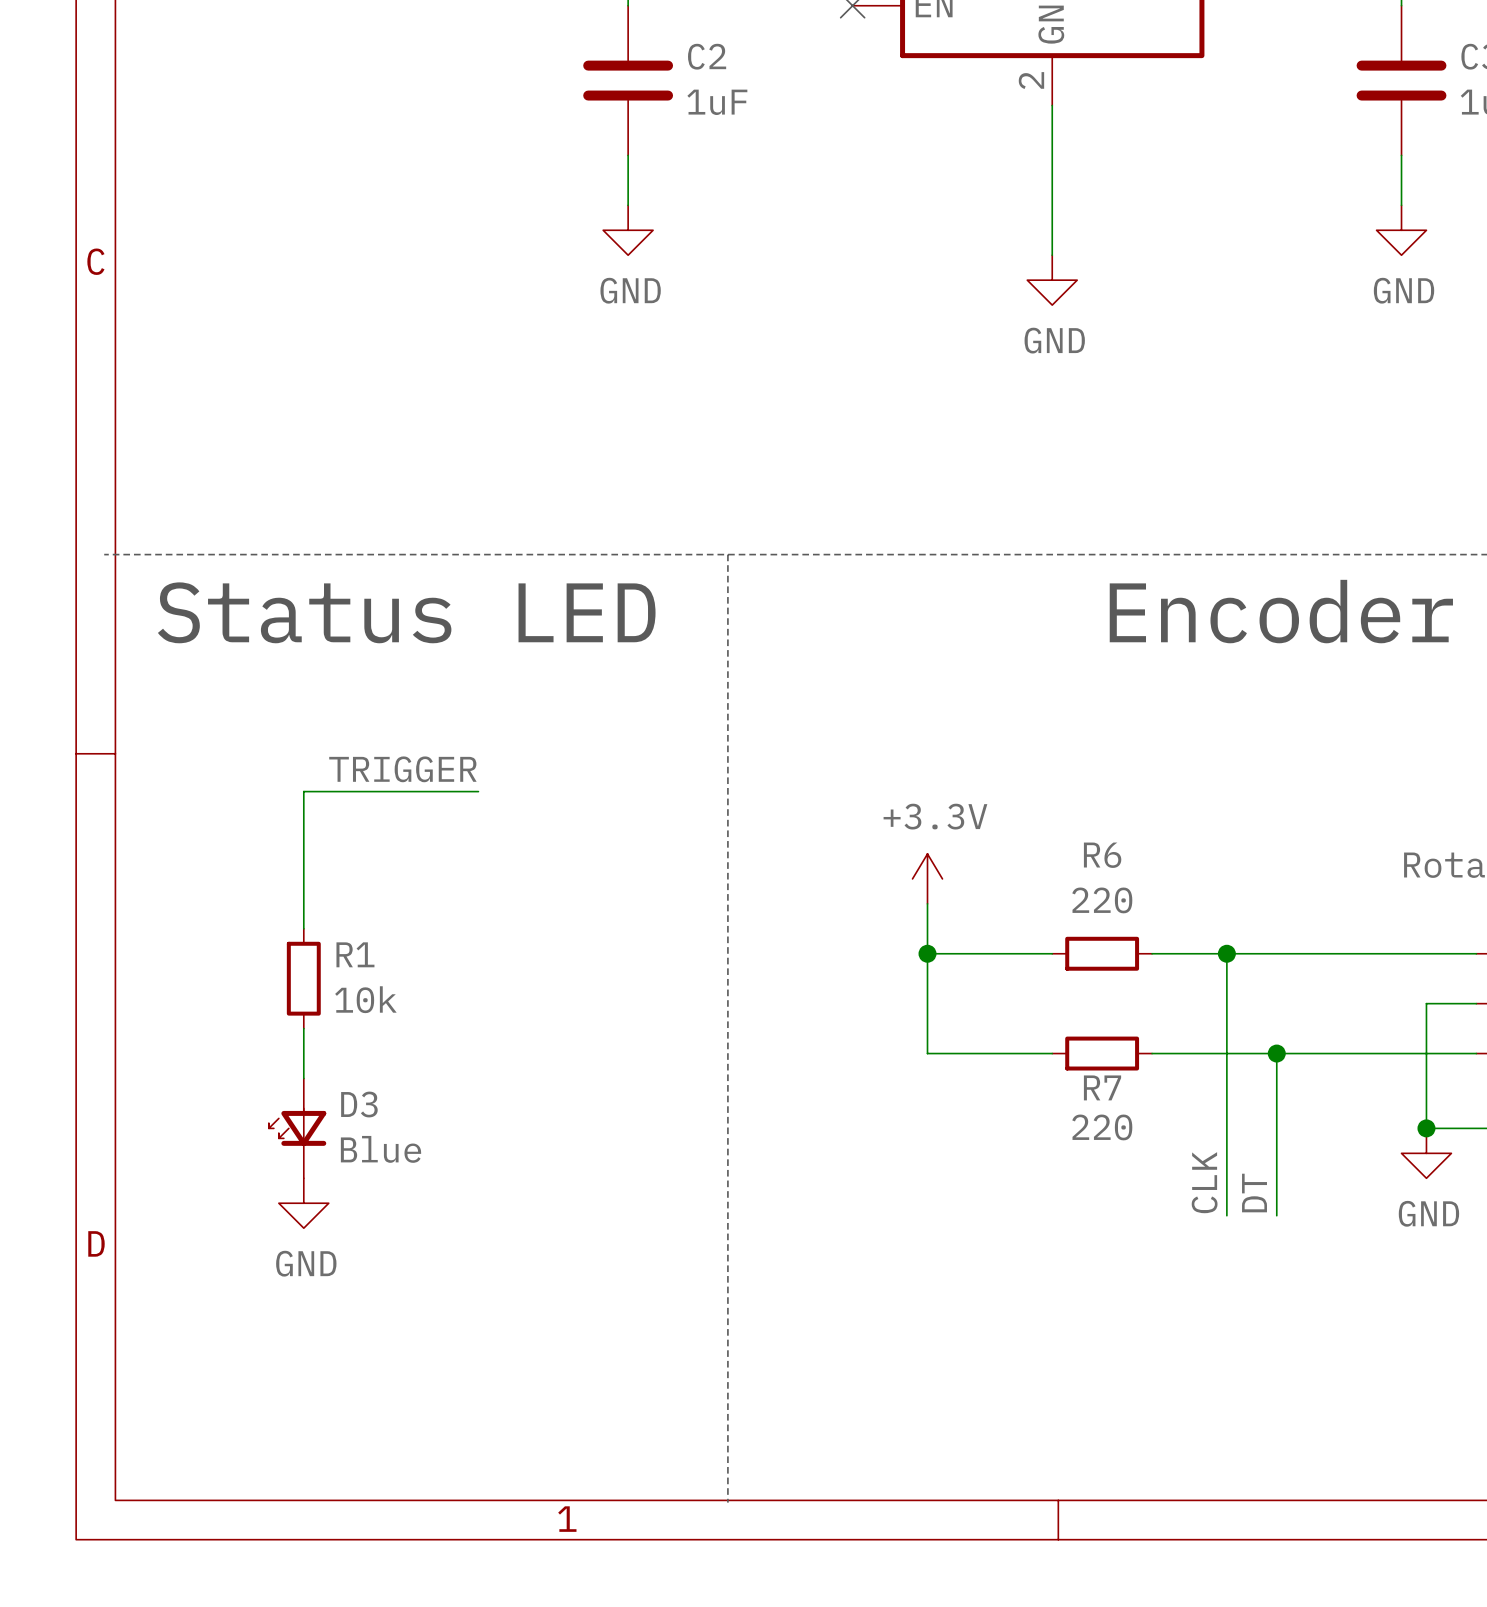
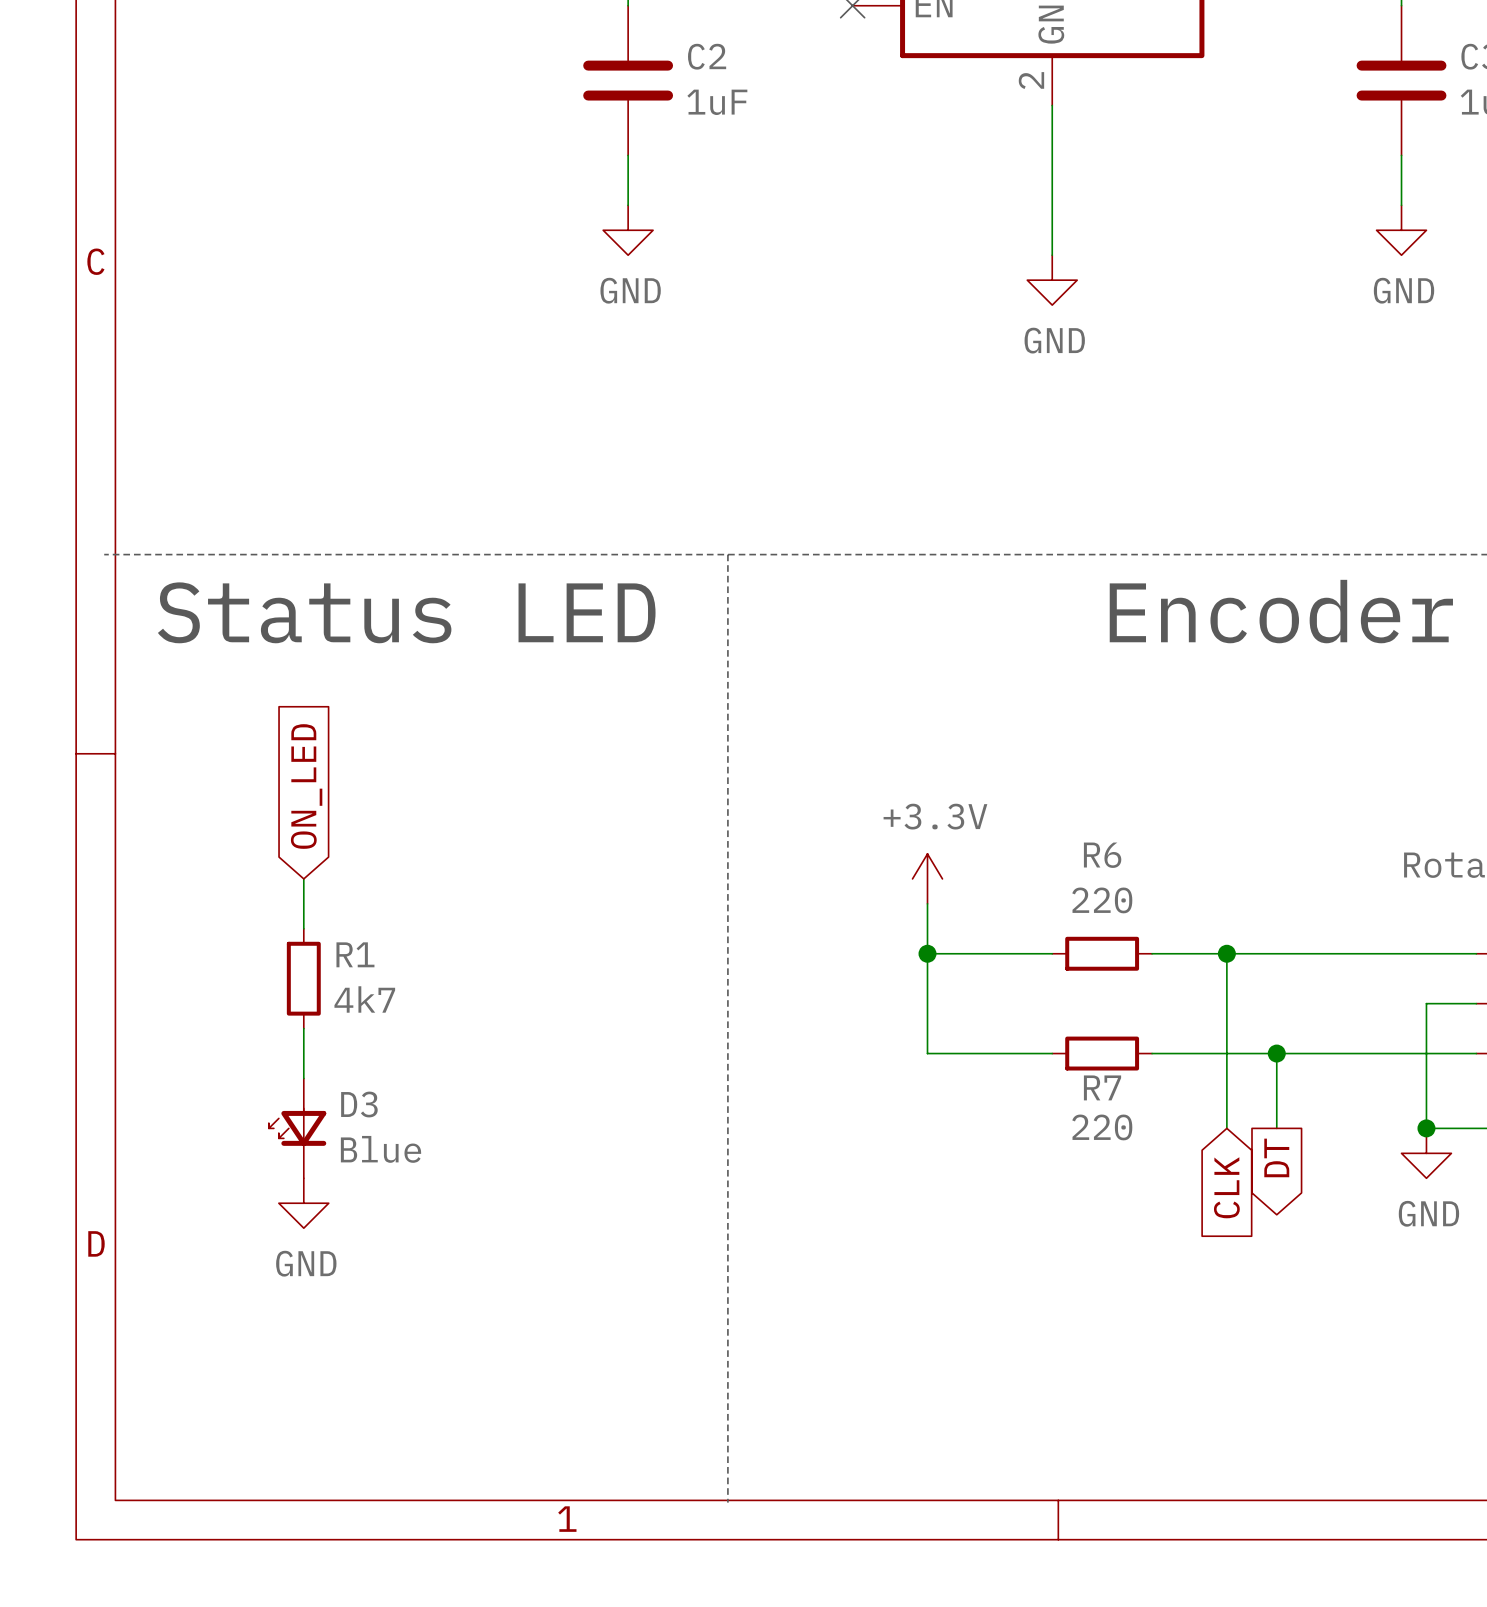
label: TRIGGER (402, 769) -> none
global label: none -> ON_LED (306, 786)
wire: (478, 791) (303, 791) (303, 878) -> none
R1 value: 10k (365, 999) -> 4k7 (364, 999)
wire: (1226, 1128) (1226, 1215) -> none
wire: (1276, 1128) (1276, 1215) -> none
global label: none -> DT (1276, 1157)
label: CLK (1204, 1182) -> none
global label: none -> CLK (1226, 1187)
label: DT (1254, 1193) -> none

